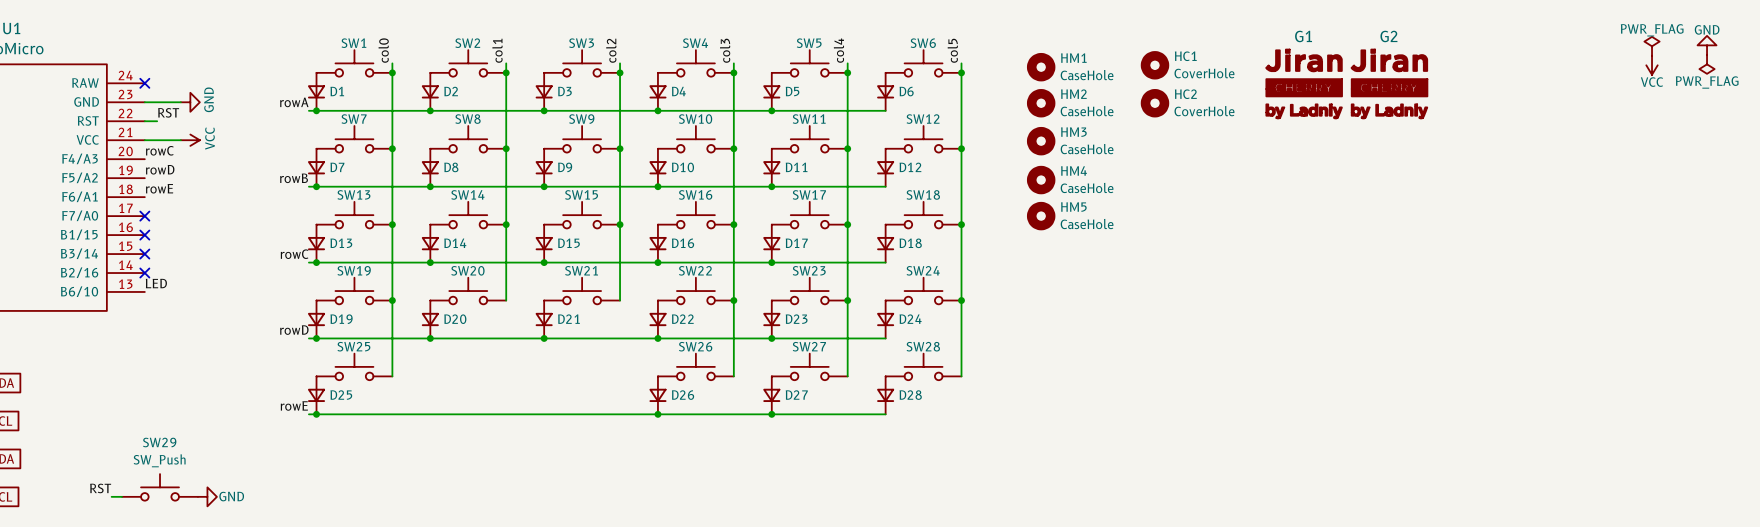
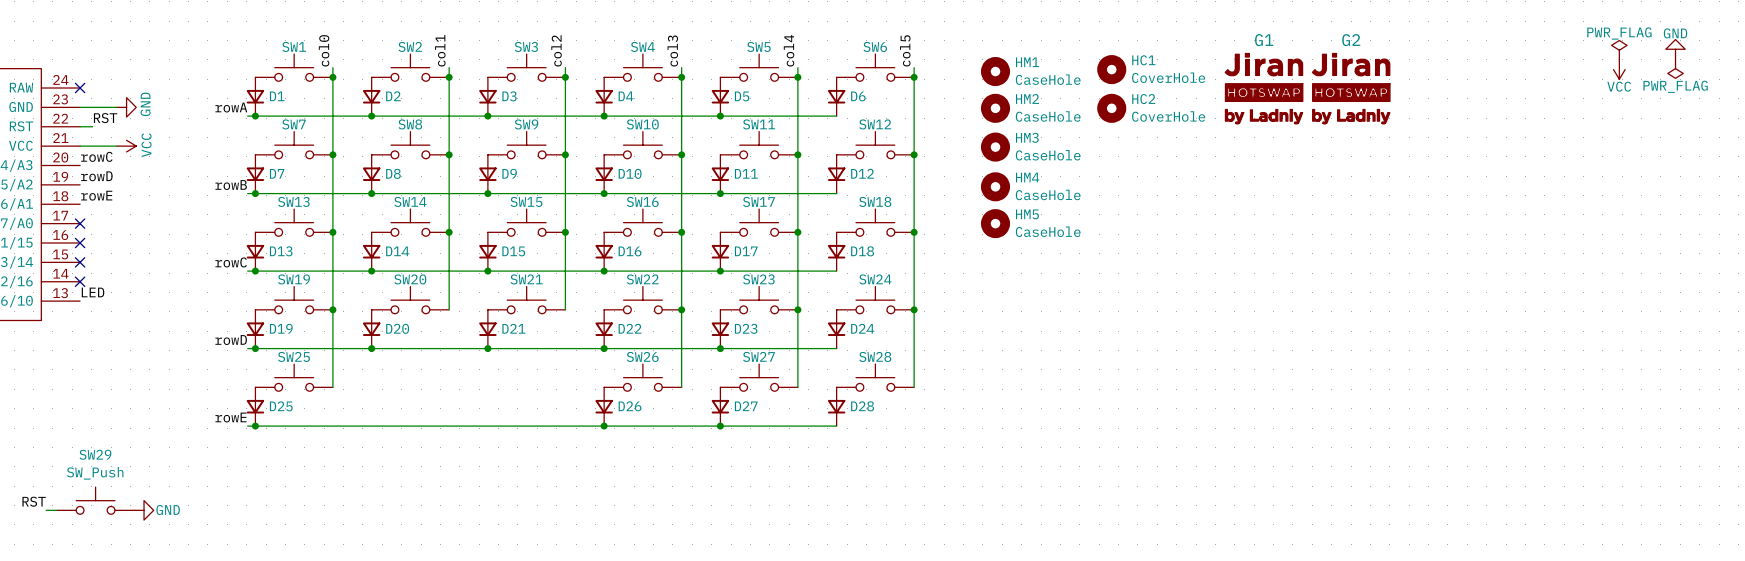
G1 symbol: [1266, 49, 1343, 119] -> [1225, 53, 1303, 124]
G2 symbol: [1351, 49, 1428, 119] -> [1312, 53, 1391, 124]

